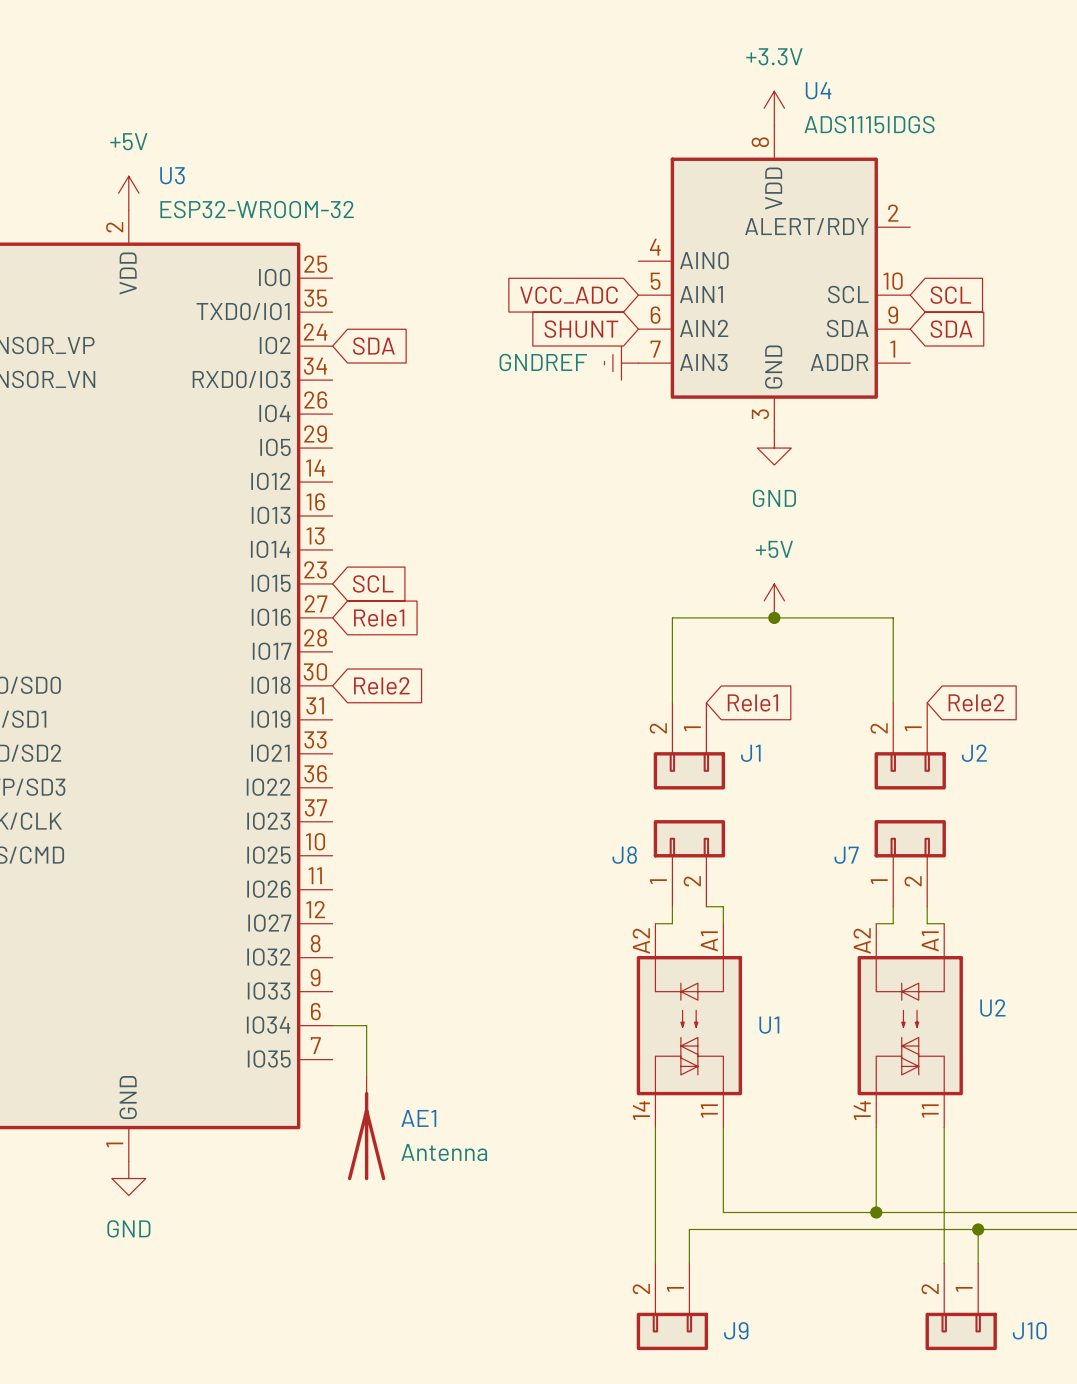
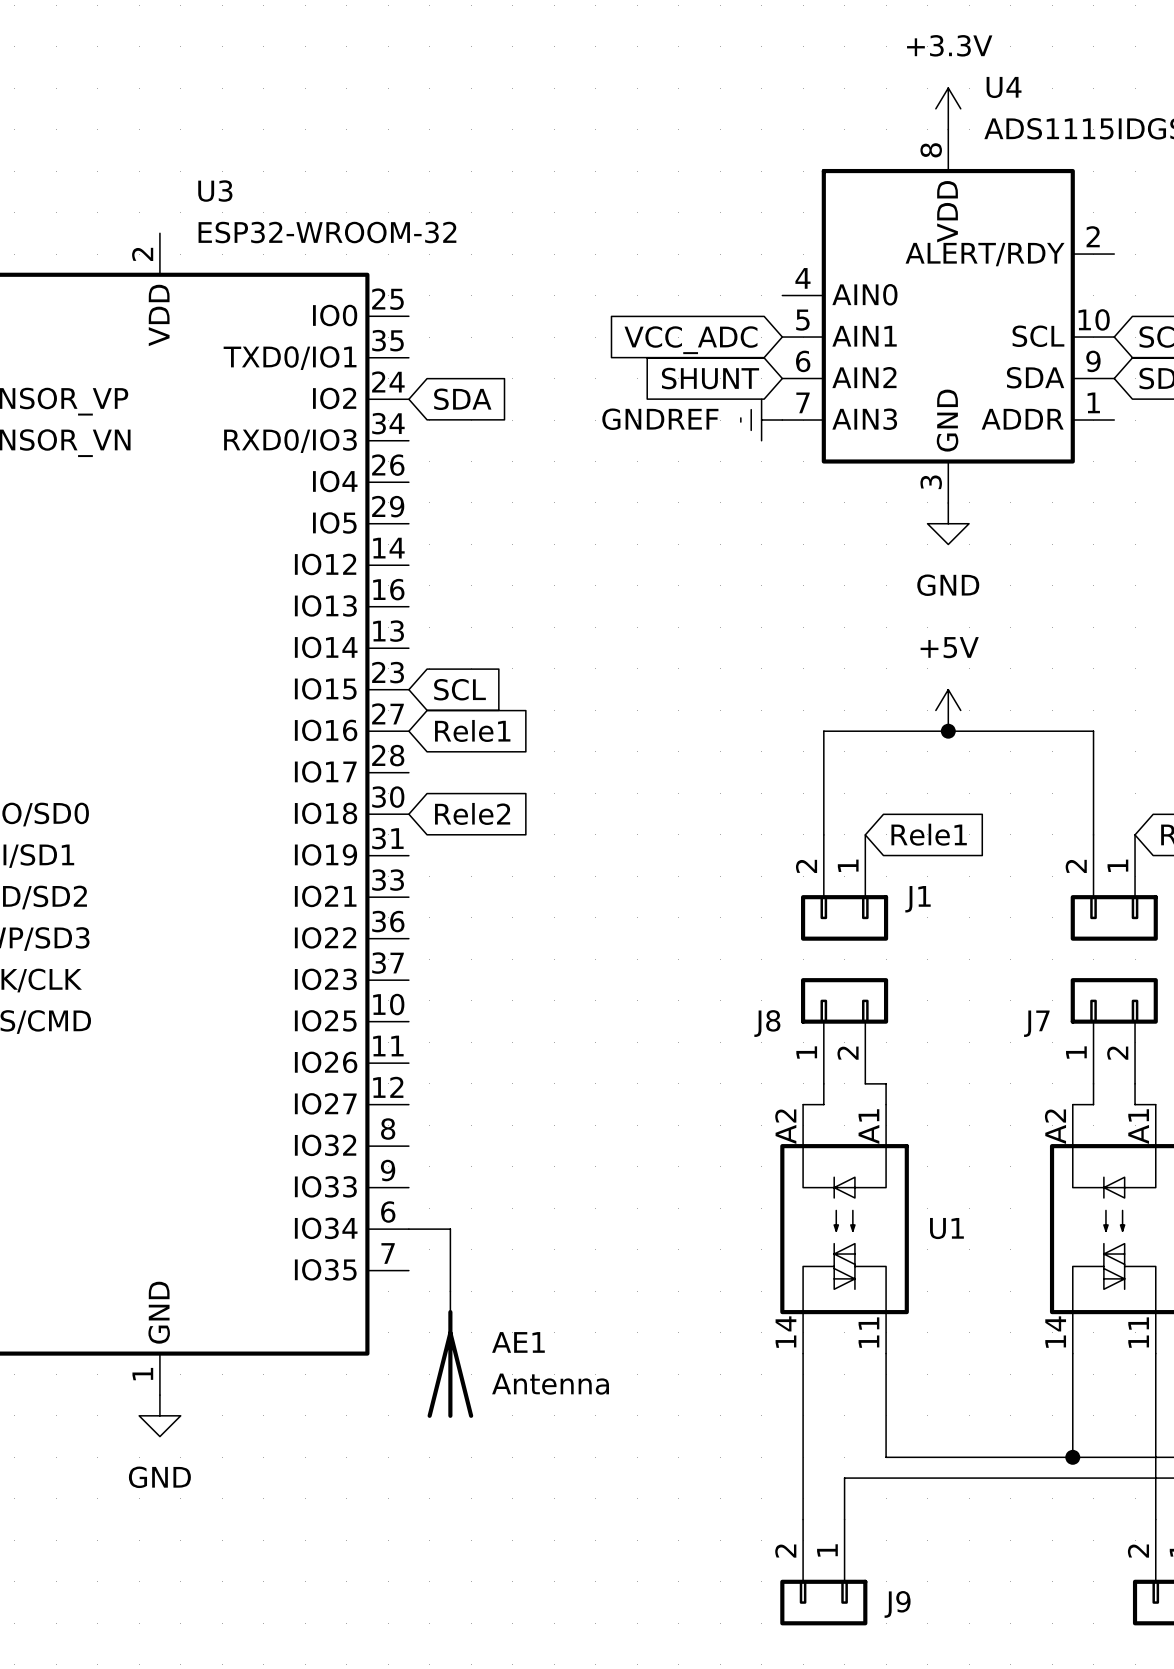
power symbol: +5V (128, 193) -> none

